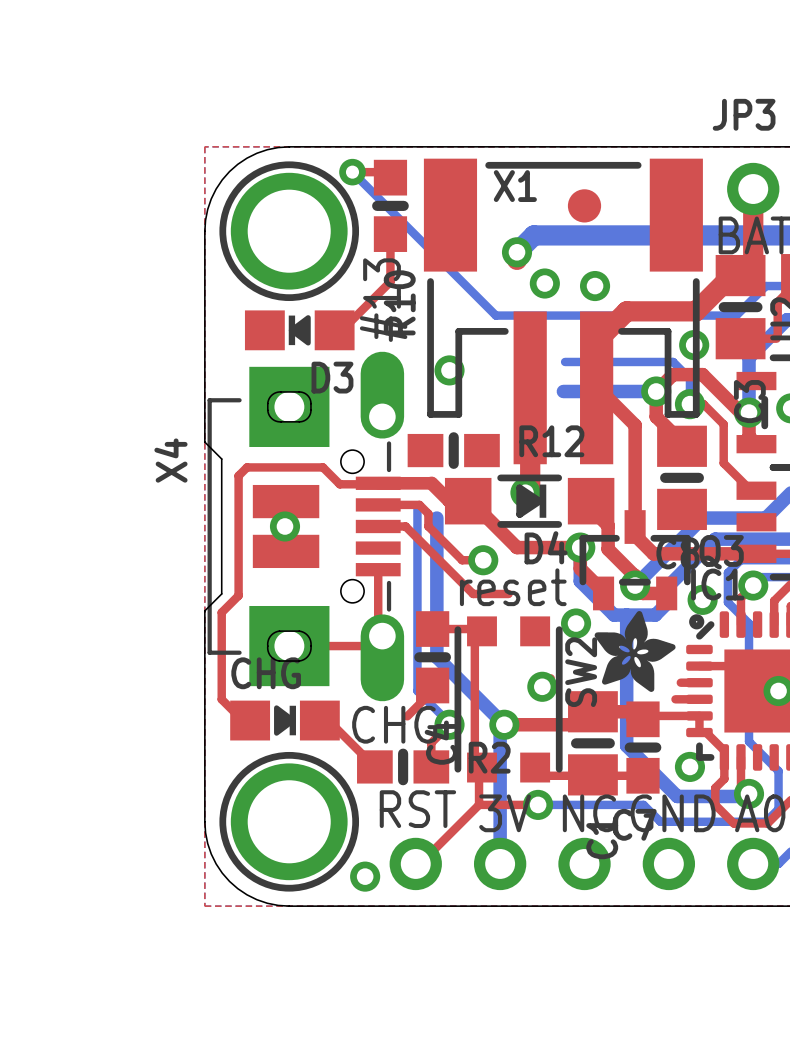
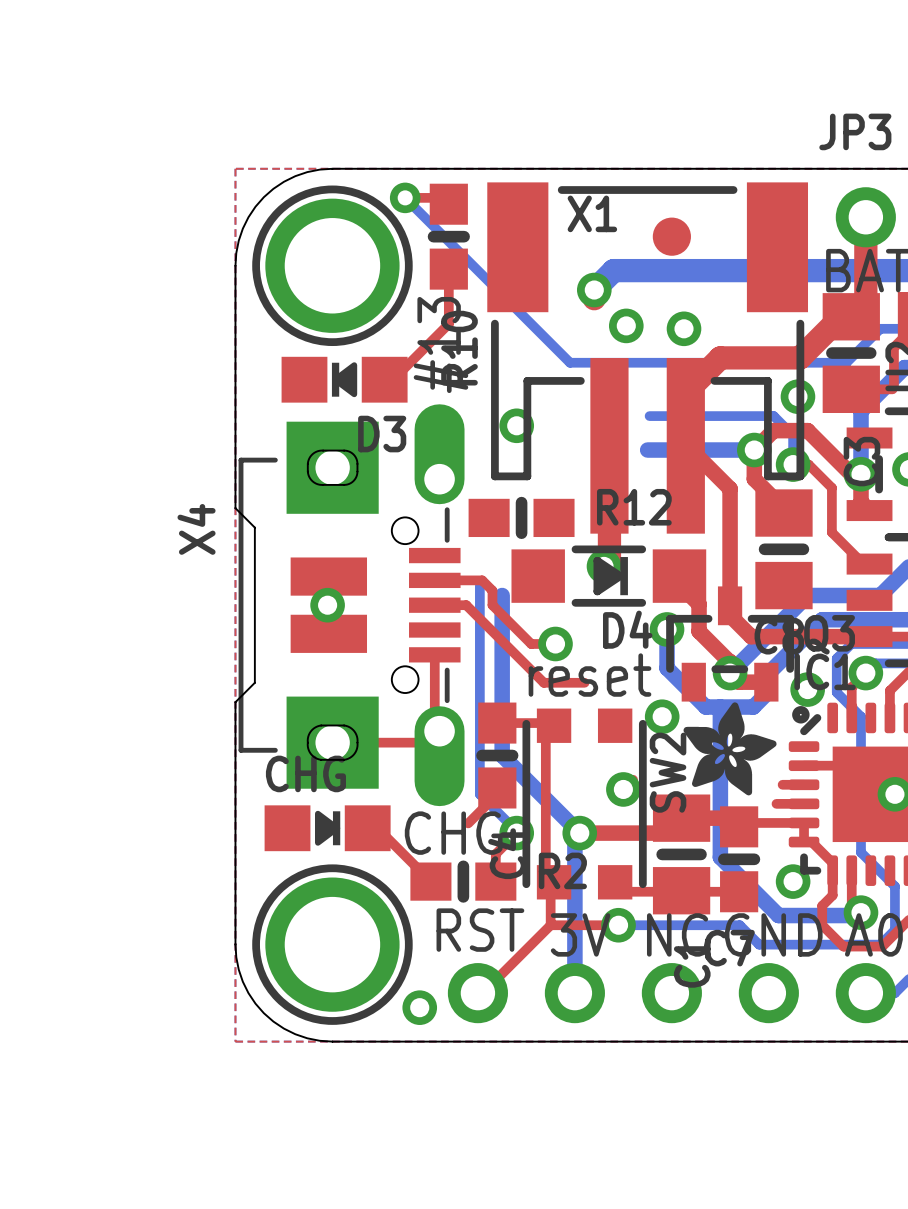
top track: (378, 483) (431, 483) (449, 501) (468, 501) -> none
top track: (377, 484) (339, 484) (322, 467) (247, 467) (238, 475) (238, 595) (221, 612) (221, 699) (242, 720) -> none
top track: (470, 501) (517, 547) (580, 547) (580, 568) (603, 591) -> none

